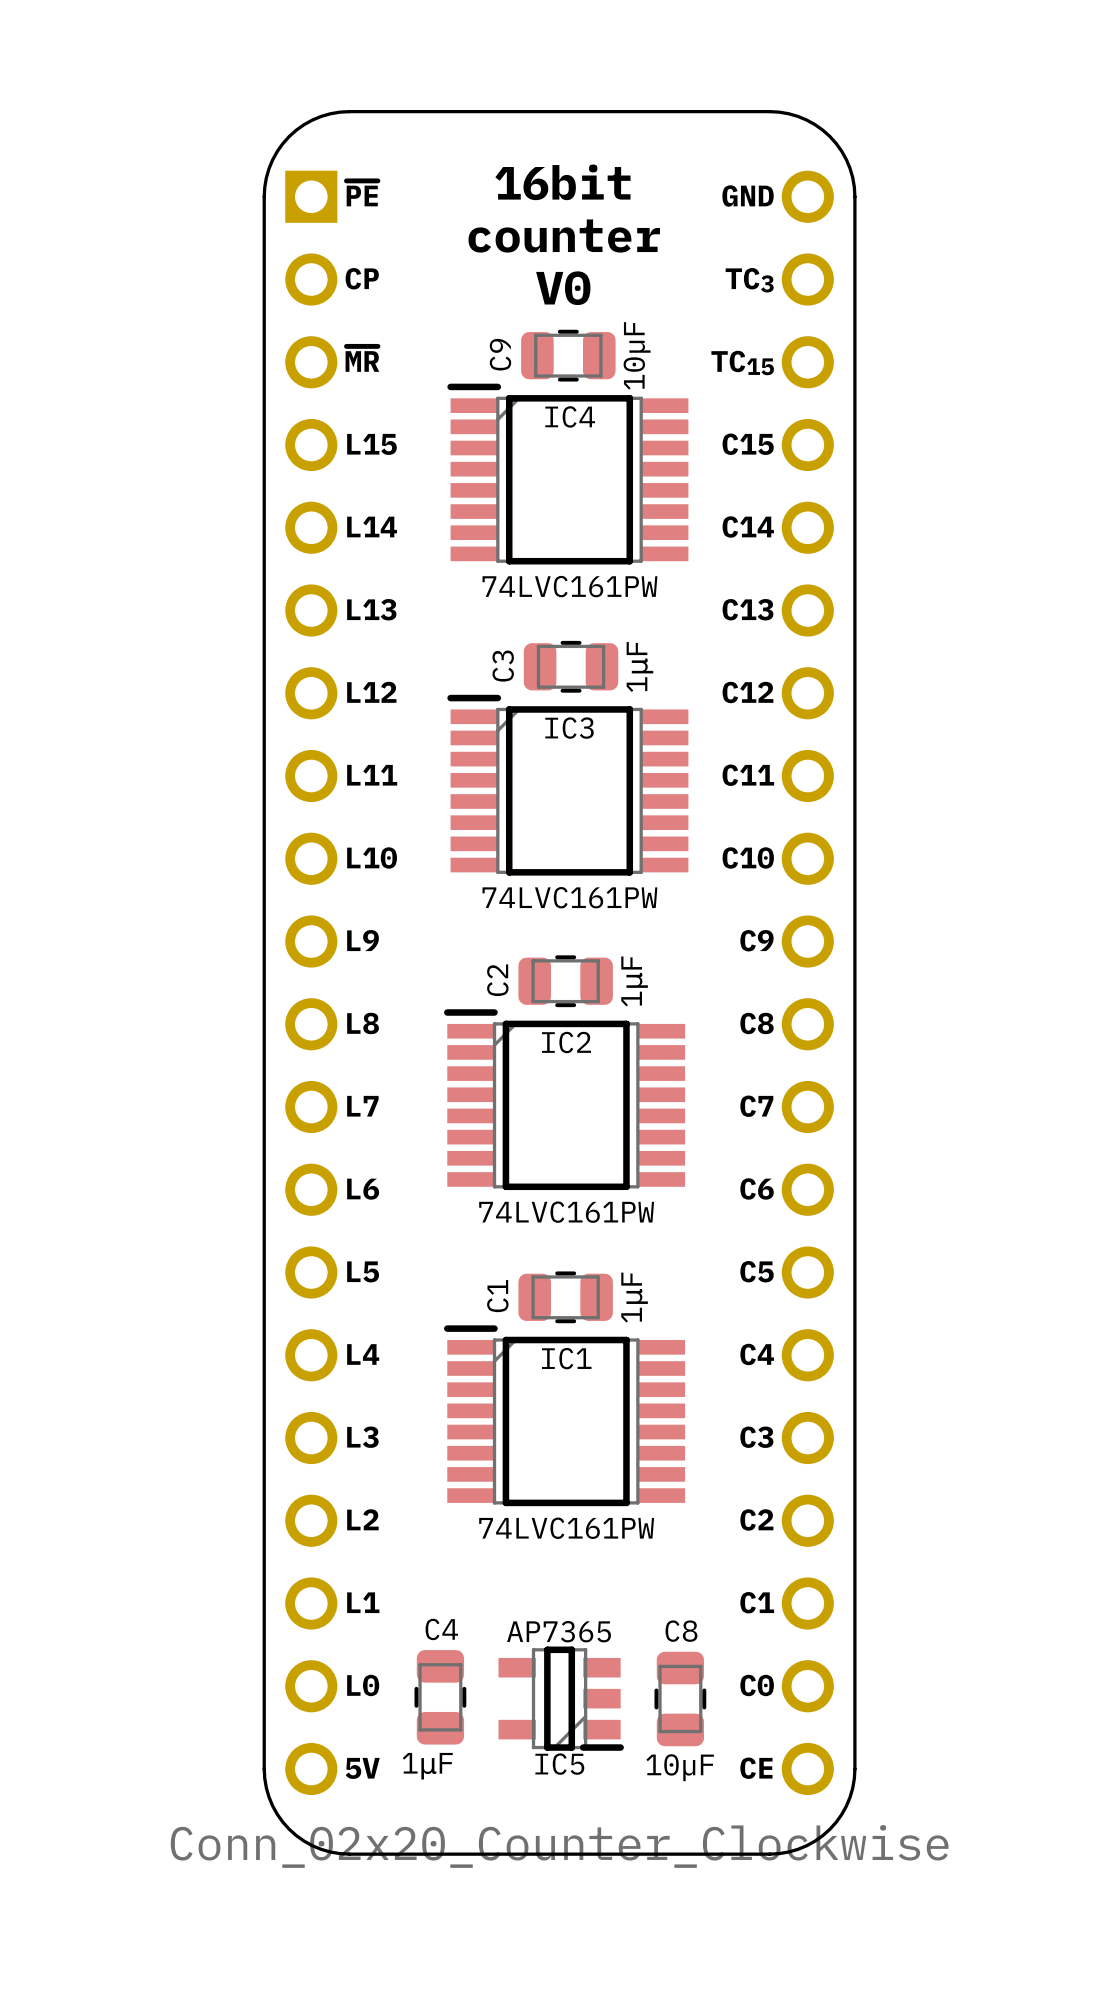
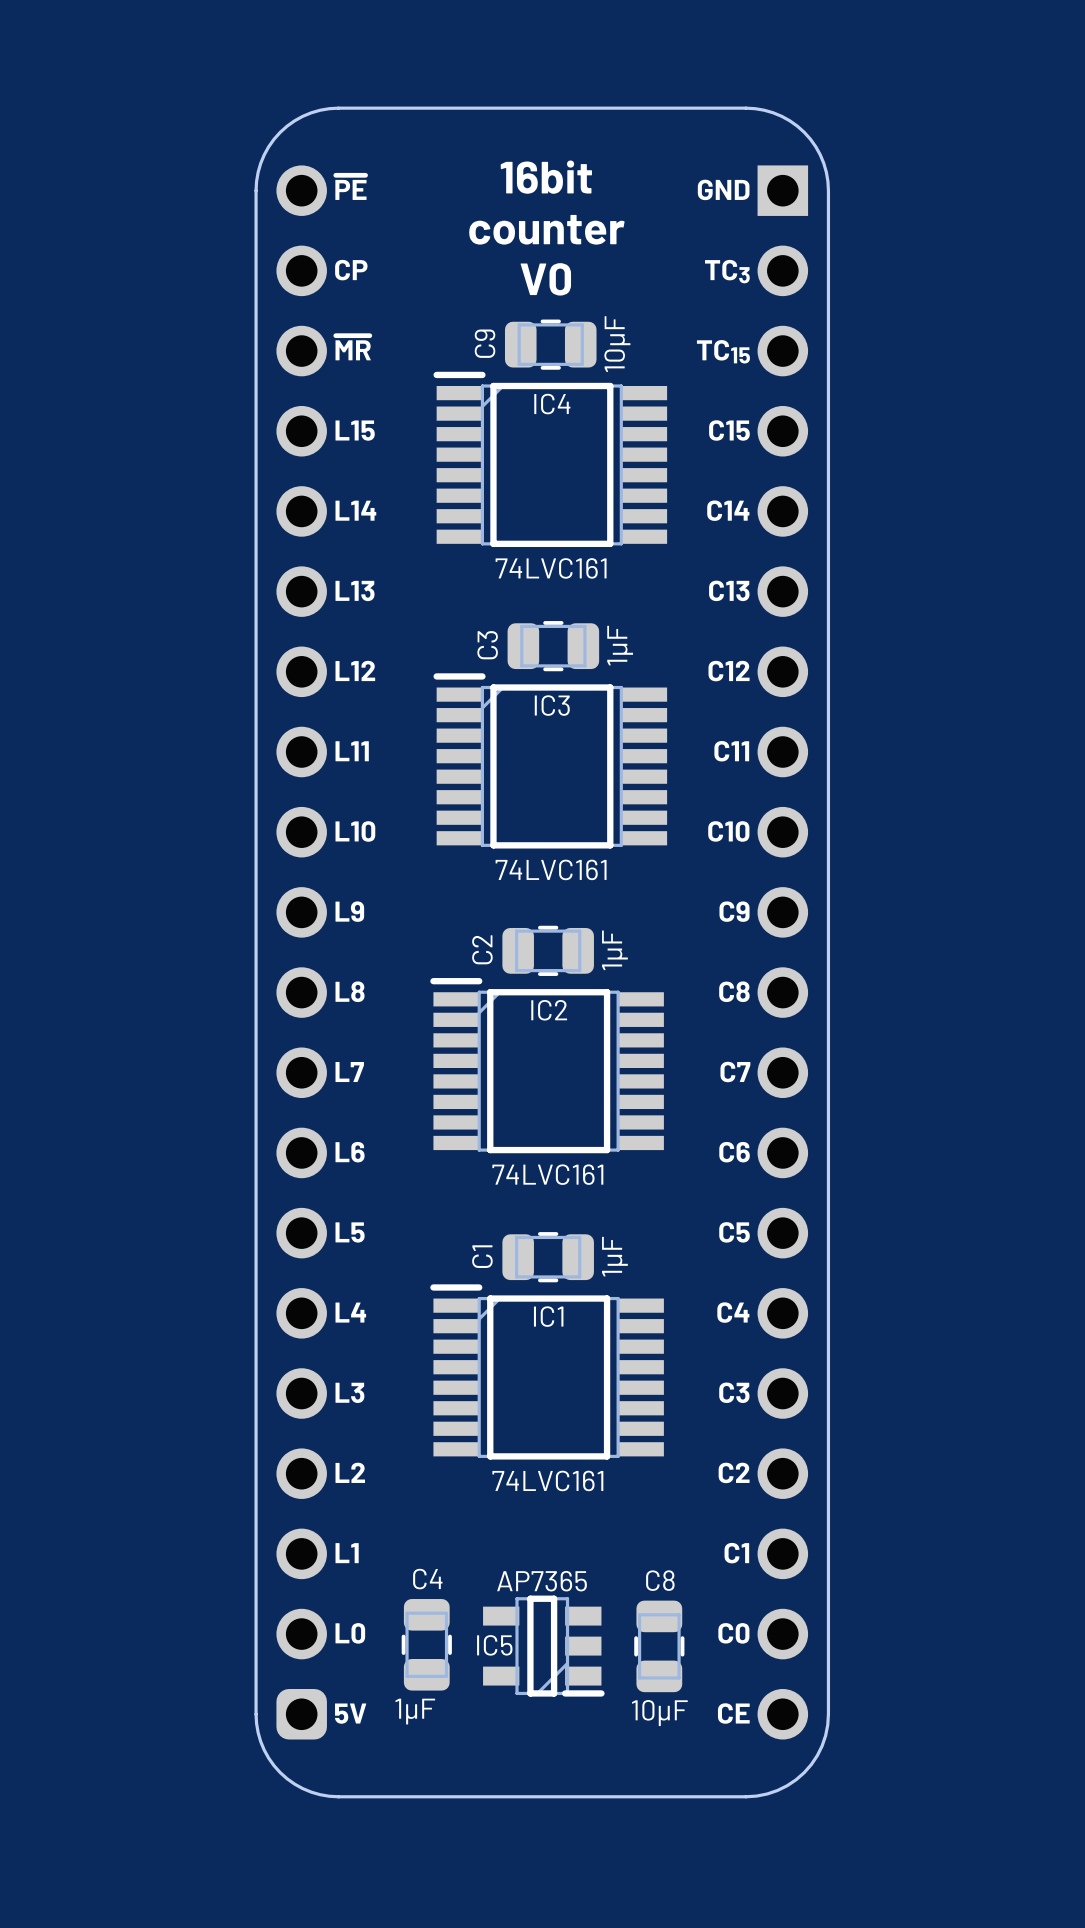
board edge: (349, 111) (779, 112) (797, 116) (822, 130) (841, 151) (852, 177) (854, 196) (854, 1769) (850, 1797) (836, 1822) (815, 1841) (788, 1852) (769, 1854) (339, 1853) (312, 1845) (296, 1835) (277, 1814) (266, 1787) (264, 1769) (264, 196) (266, 177) (272, 159) (289, 136) (304, 124) (321, 116) (349, 111) -> none
part footprint: [285, 170, 834, 1796] -> [254, 106, 831, 1799]
IC4 text: 74LVC161PW (569, 586) -> 74LVC161 (551, 568)
IC3 text: 74LVC161PW (569, 897) -> 74LVC161 (551, 869)
IC2 text: 74LVC161PW (566, 1212) -> 74LVC161 (547, 1174)
IC1 text: 74LVC161PW (566, 1528) -> 74LVC161 (547, 1480)
IC5 name position: IC5 (559, 1764) -> IC5 (494, 1645)
part value: Conn_02x20_Counter_Clockwise (559, 1846) -> none

